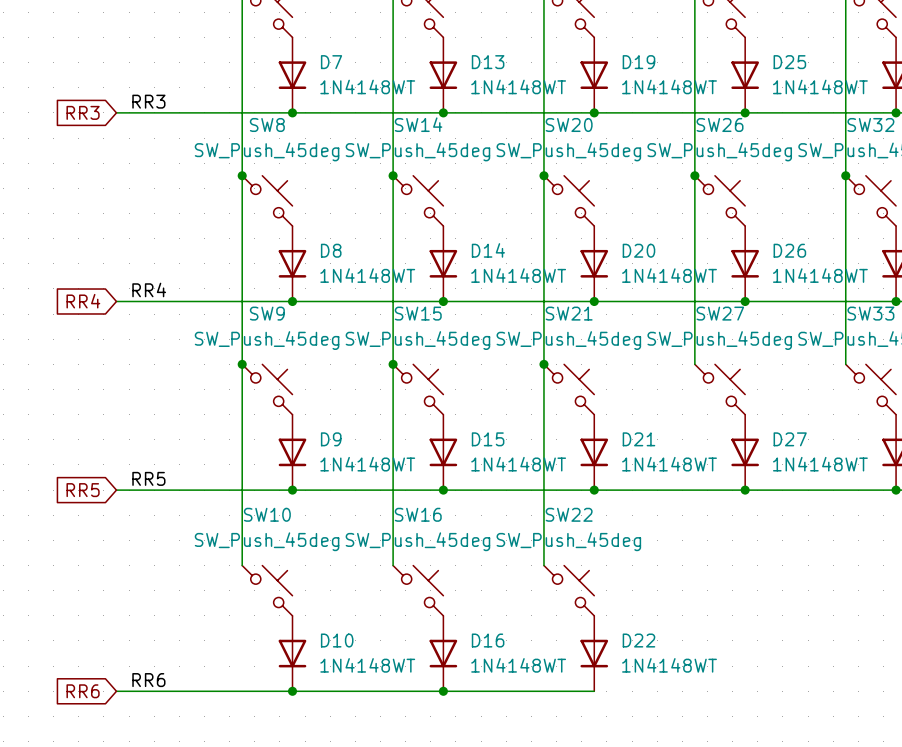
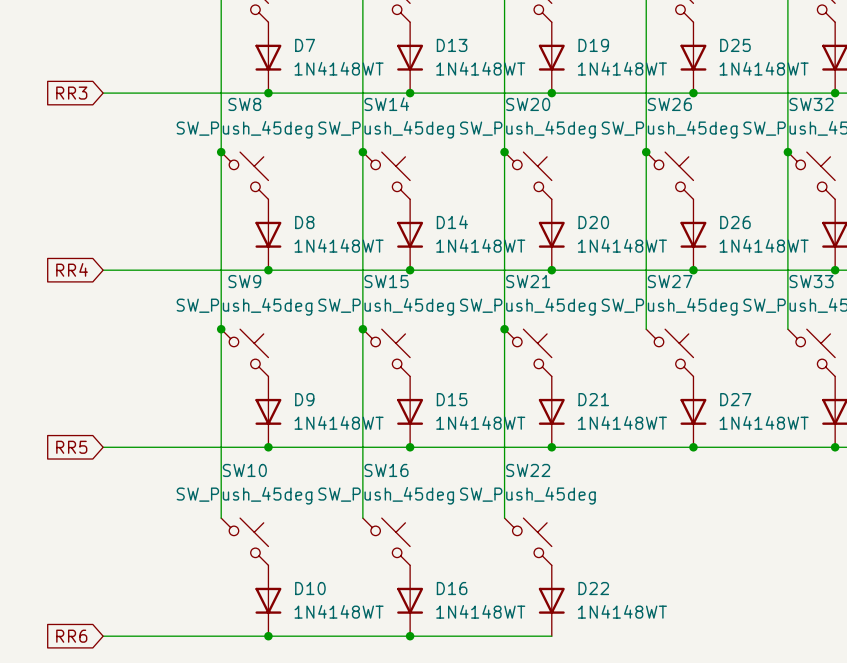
label: RR3 (148, 101) -> none
label: RR4 (149, 289) -> none
label: RR5 (148, 478) -> none
label: RR6 (148, 680) -> none

